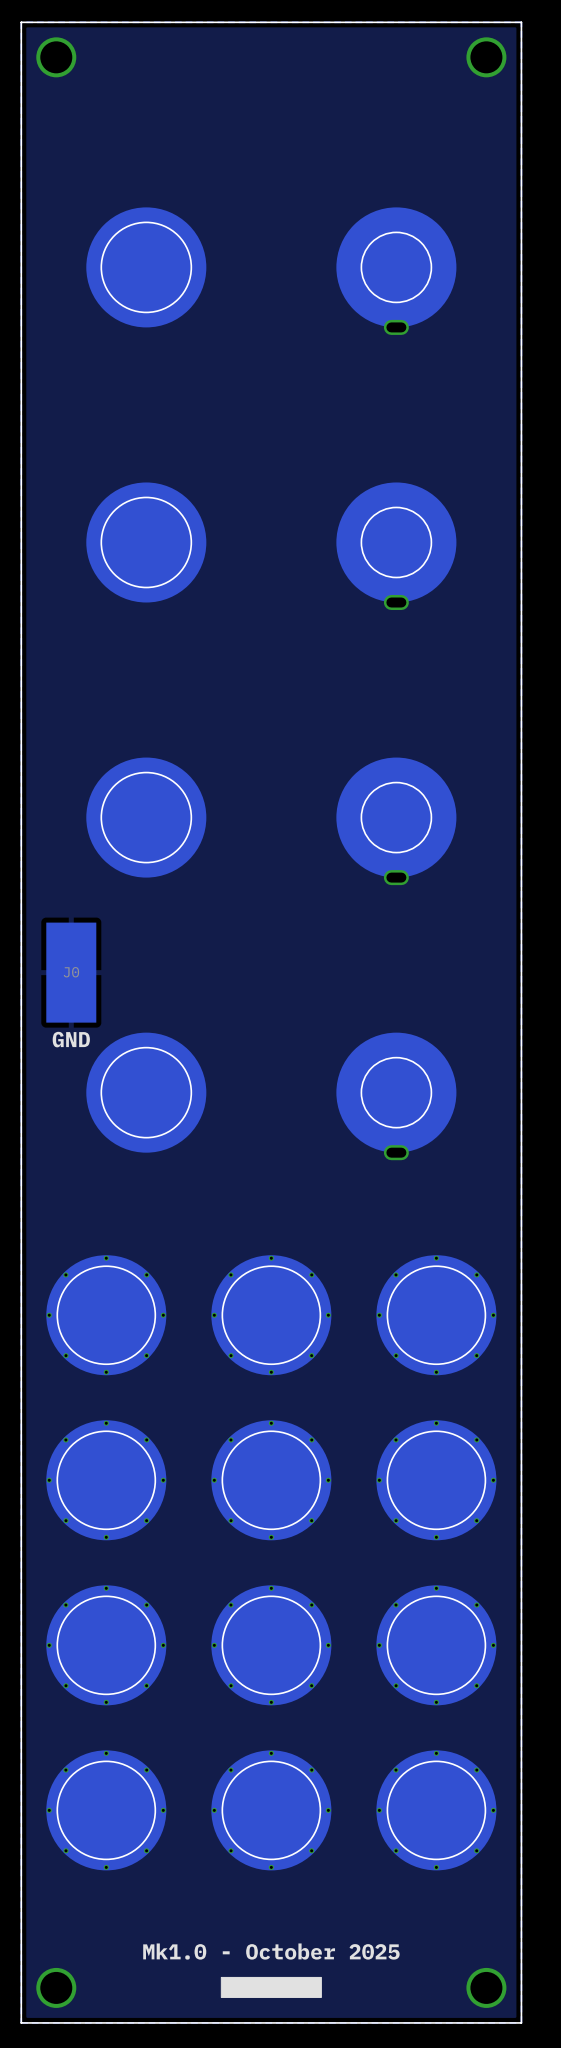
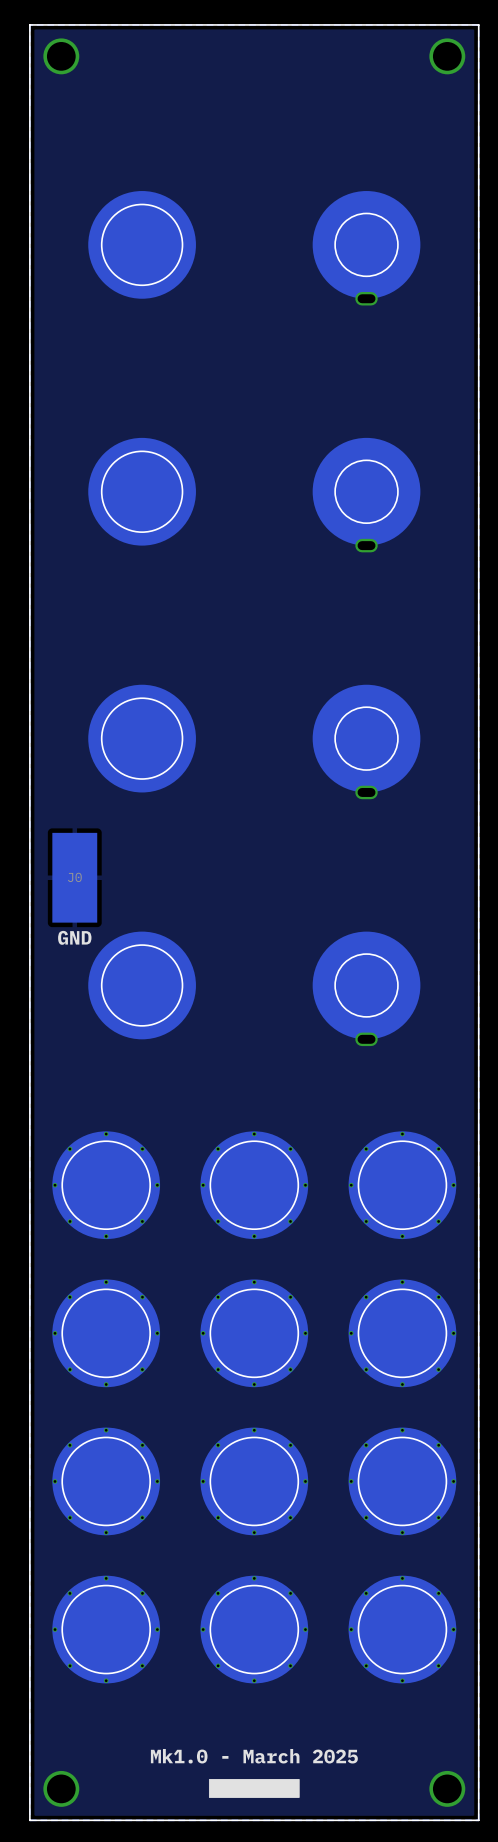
text: Mk1.0 - October 2025 (271, 1951) -> Mk1.0 - March 2025 (254, 1756)

